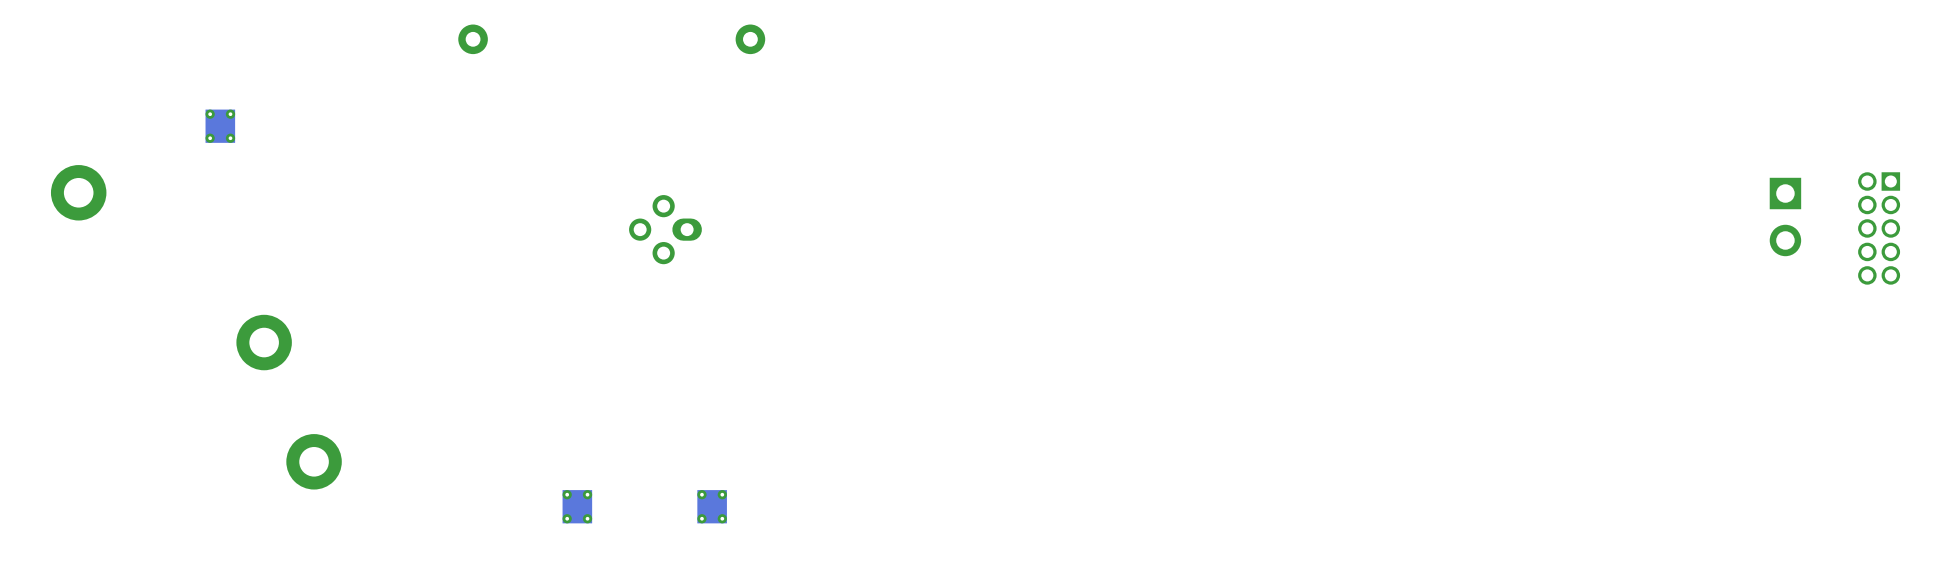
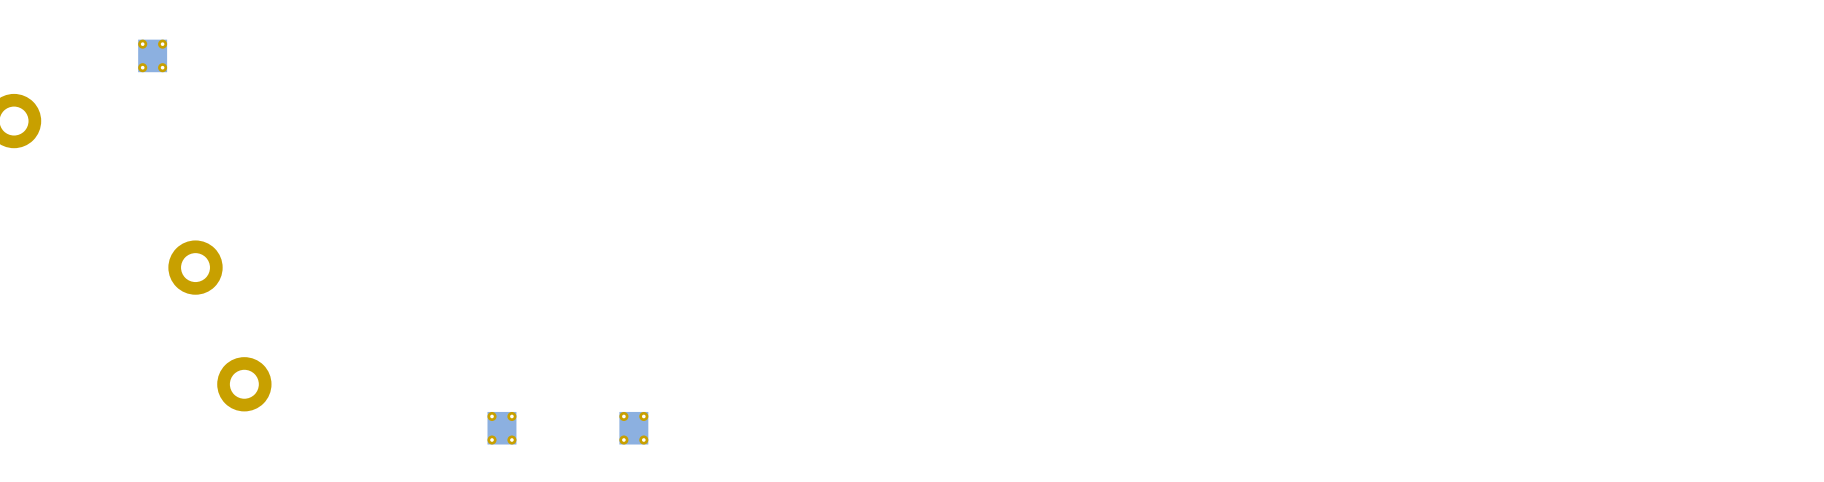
part: (1785, 217) -> none
part: (1879, 228) -> none
part: (665, 229) -> none

